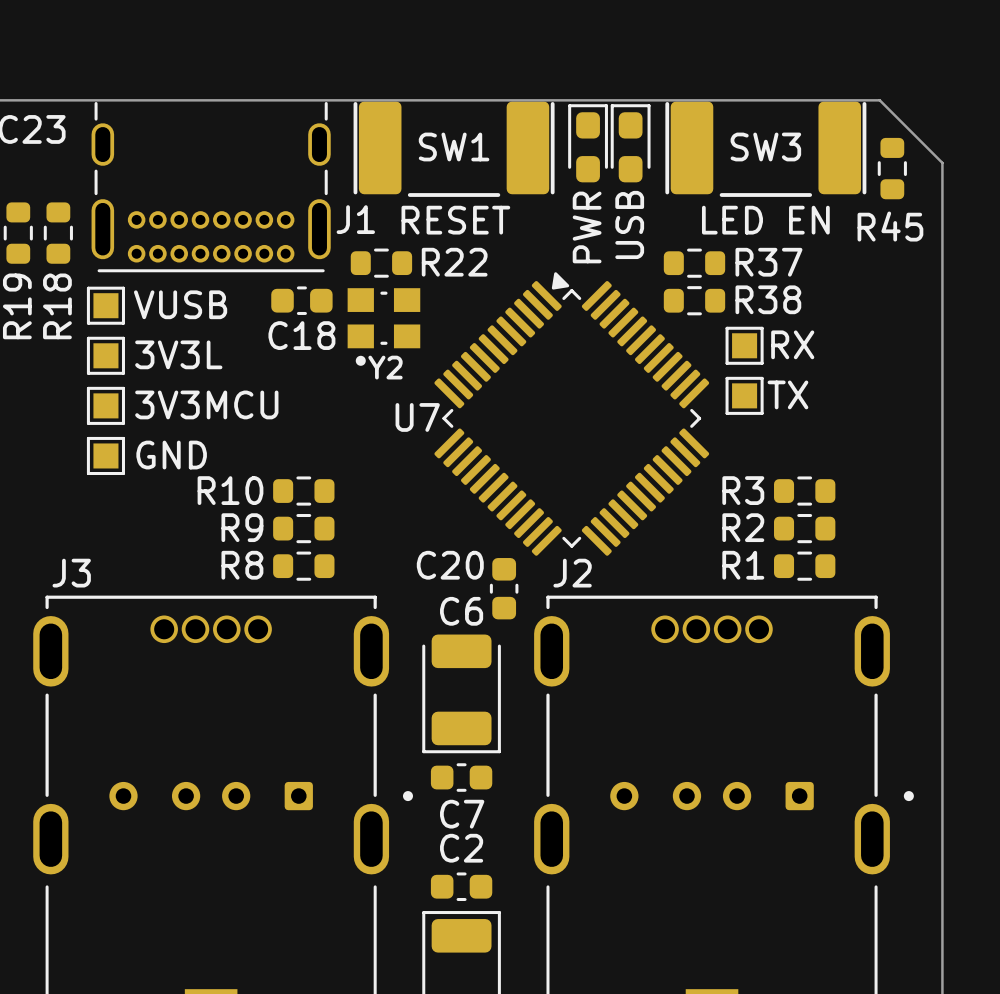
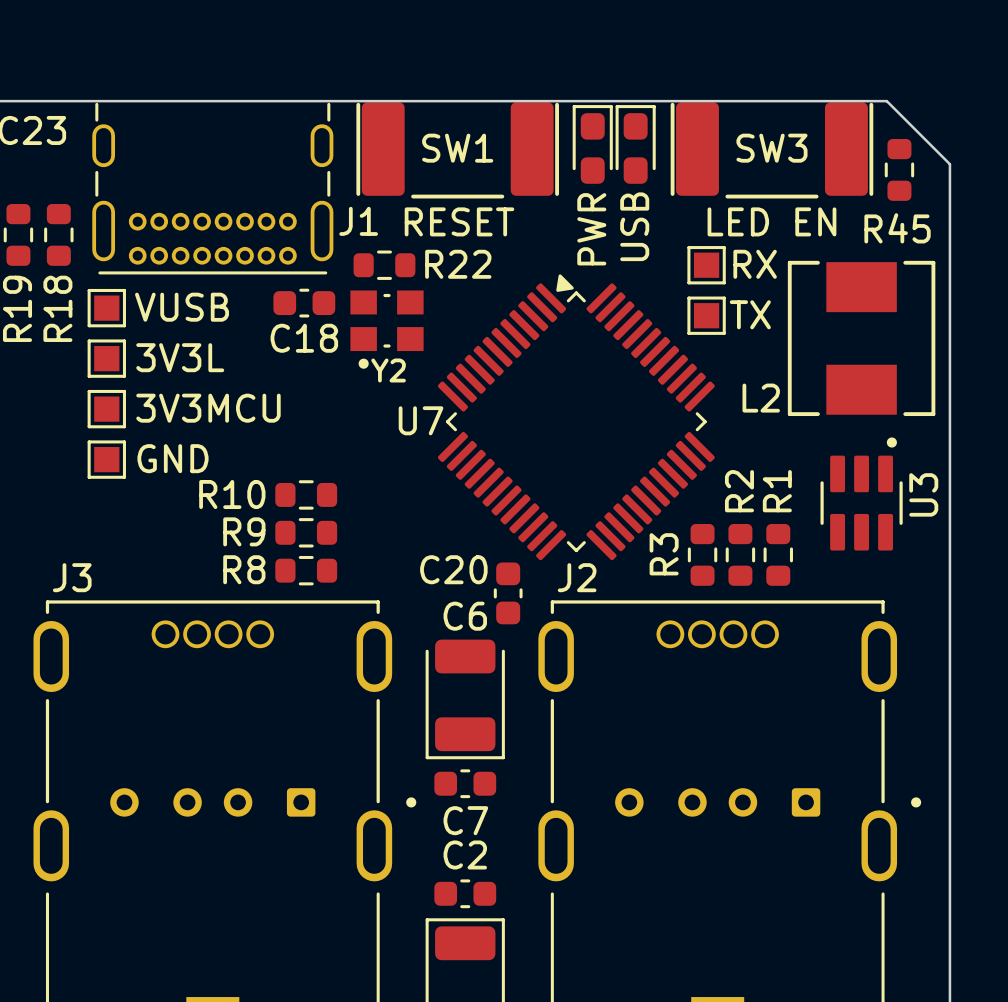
R37: (694, 263) -> none
R38: (694, 300) -> none
L2: none -> (861, 338)
part position: (744, 345) -> (706, 265)
part position: (744, 395) -> (706, 315)
U3: none -> (861, 494)
R3 rotation: 0° (804, 491) -> 90° clockwise (702, 554)
R3 position: (804, 491) -> (702, 554)
R2 rotation: 0° (804, 528) -> 90° clockwise (740, 554)
R2 position: (804, 528) -> (740, 554)
R1 rotation: 0° (804, 566) -> 90° clockwise (778, 554)

